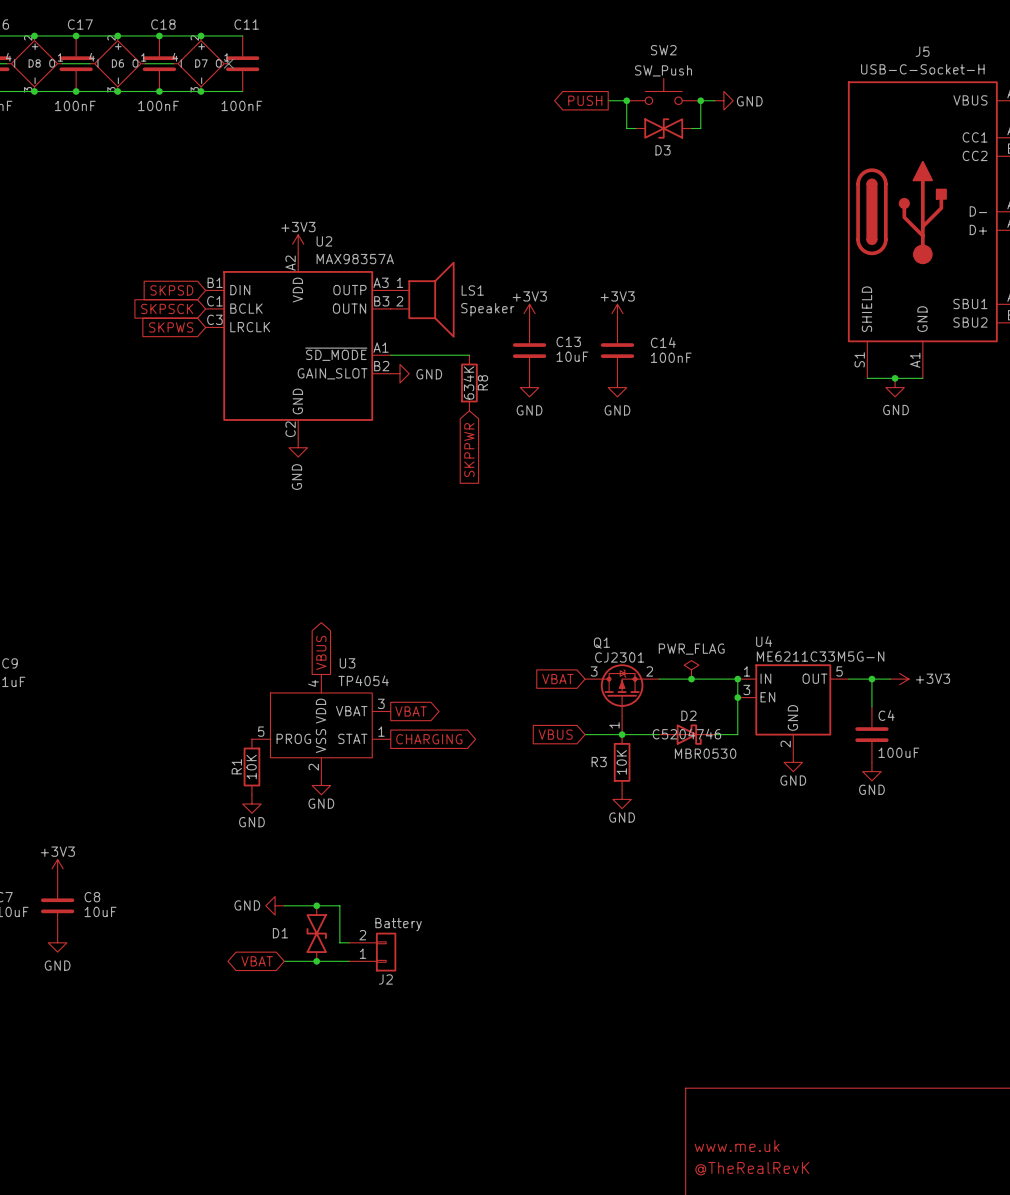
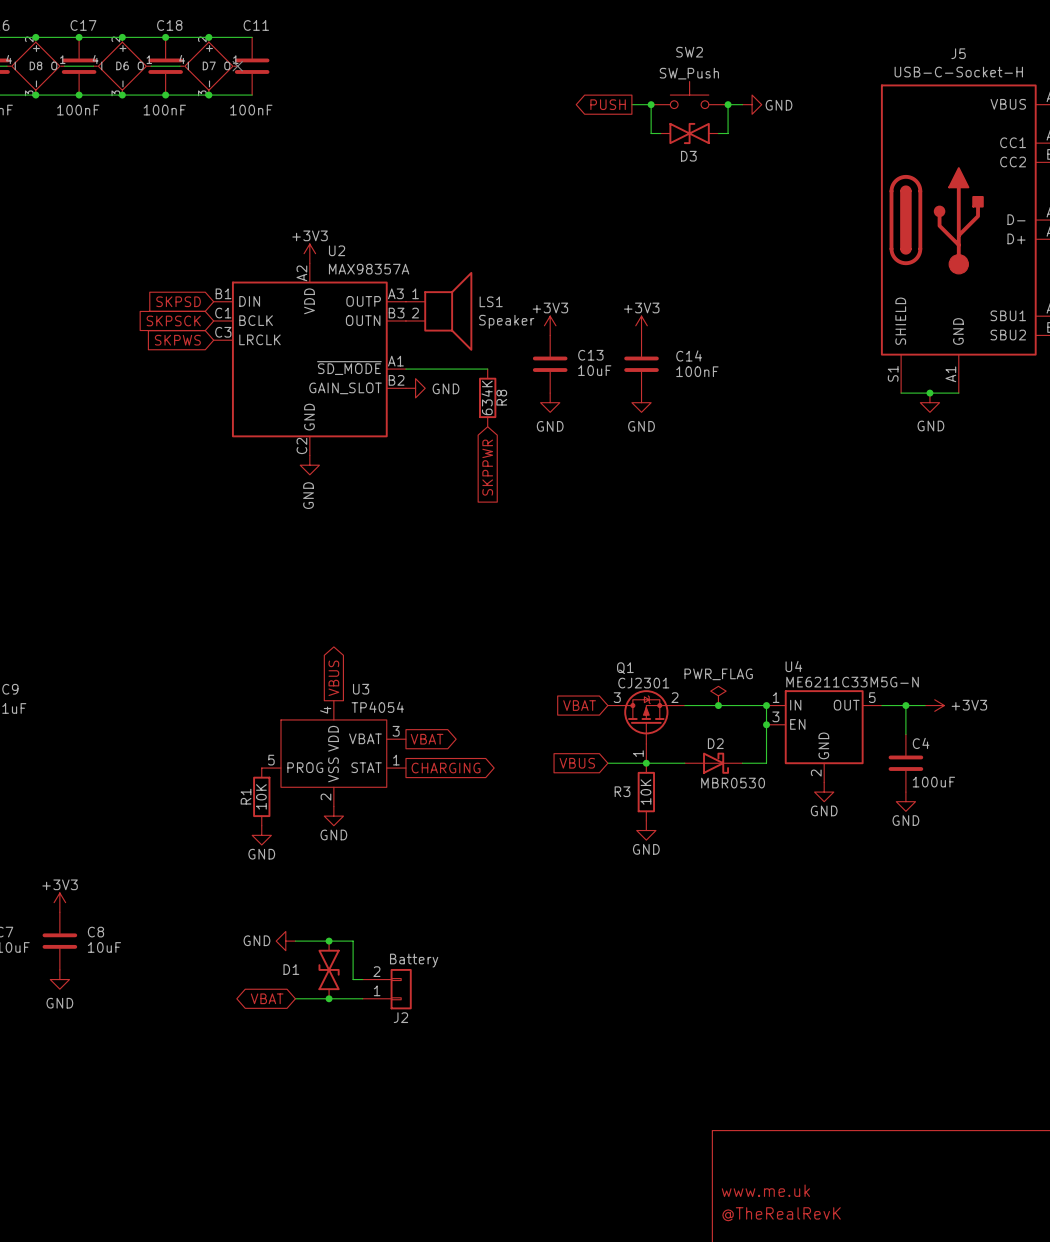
D2 text: C5204746 (686, 734) -> none

